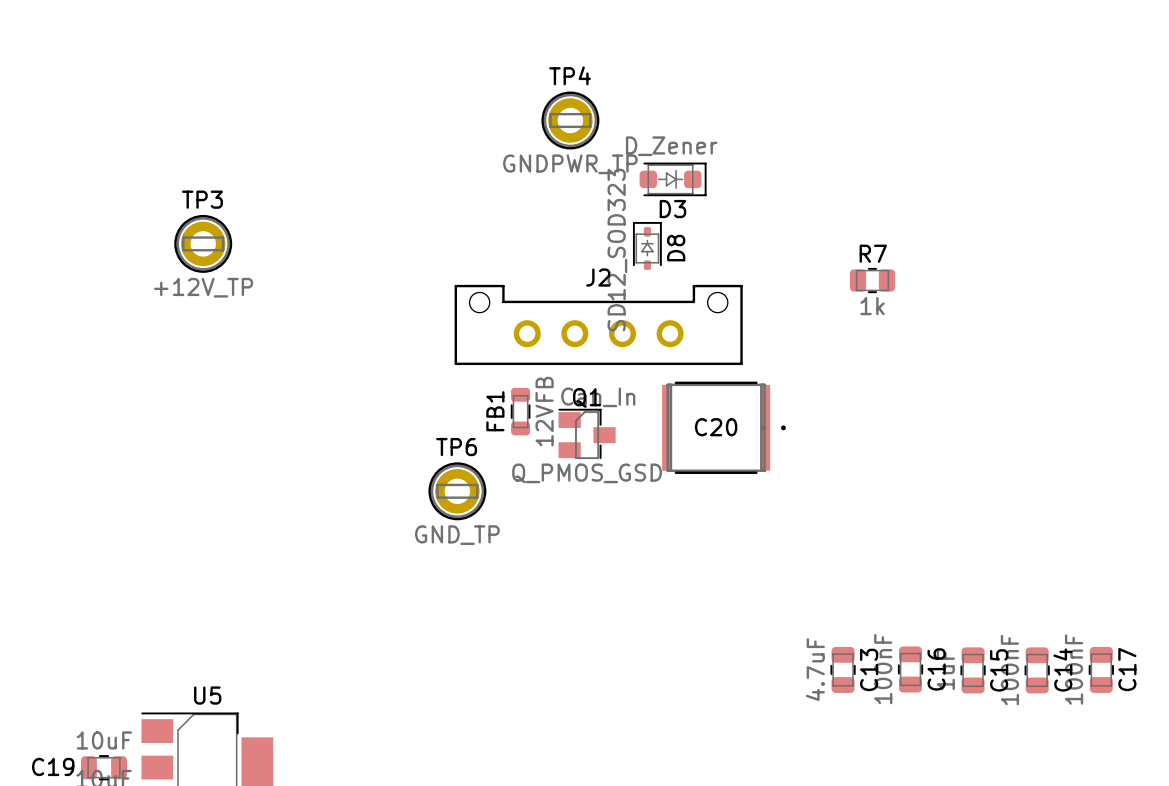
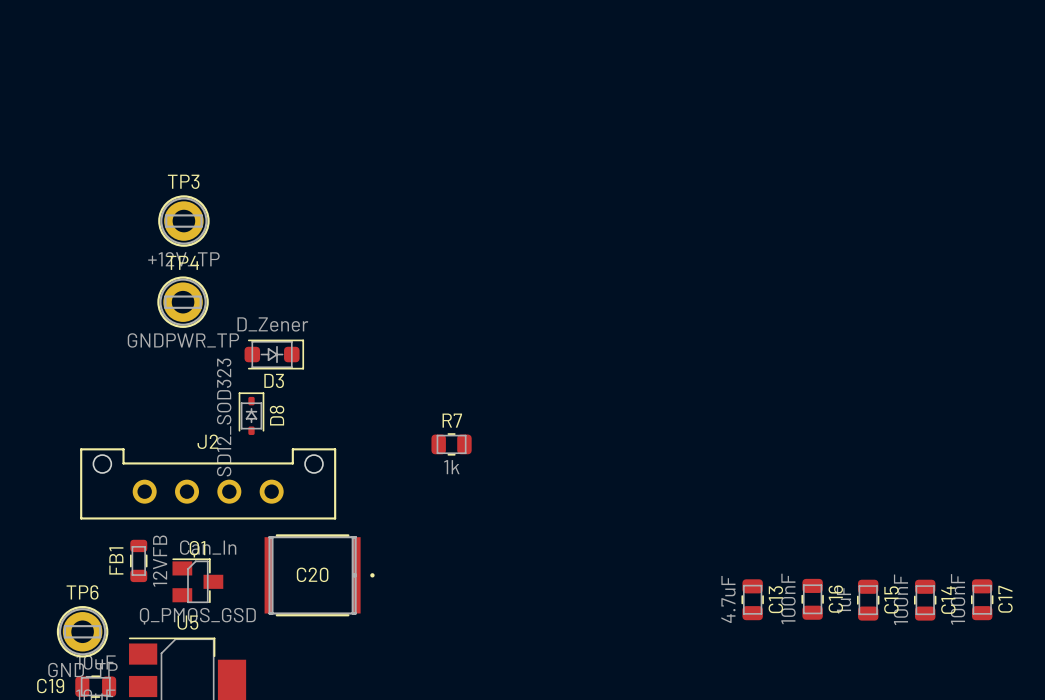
TP4 position: (570, 120) -> (183, 302)
D3 position: (673, 179) -> (274, 354)
D8 position: (647, 245) -> (251, 413)
R7 position: (872, 280) -> (451, 444)
J2 position: (598, 324) -> (208, 483)
FB1 position: (520, 411) -> (138, 560)
C20 position: (723, 427) -> (319, 575)
Q1 position: (587, 433) -> (197, 580)
TP6 position: (457, 491) -> (82, 631)

